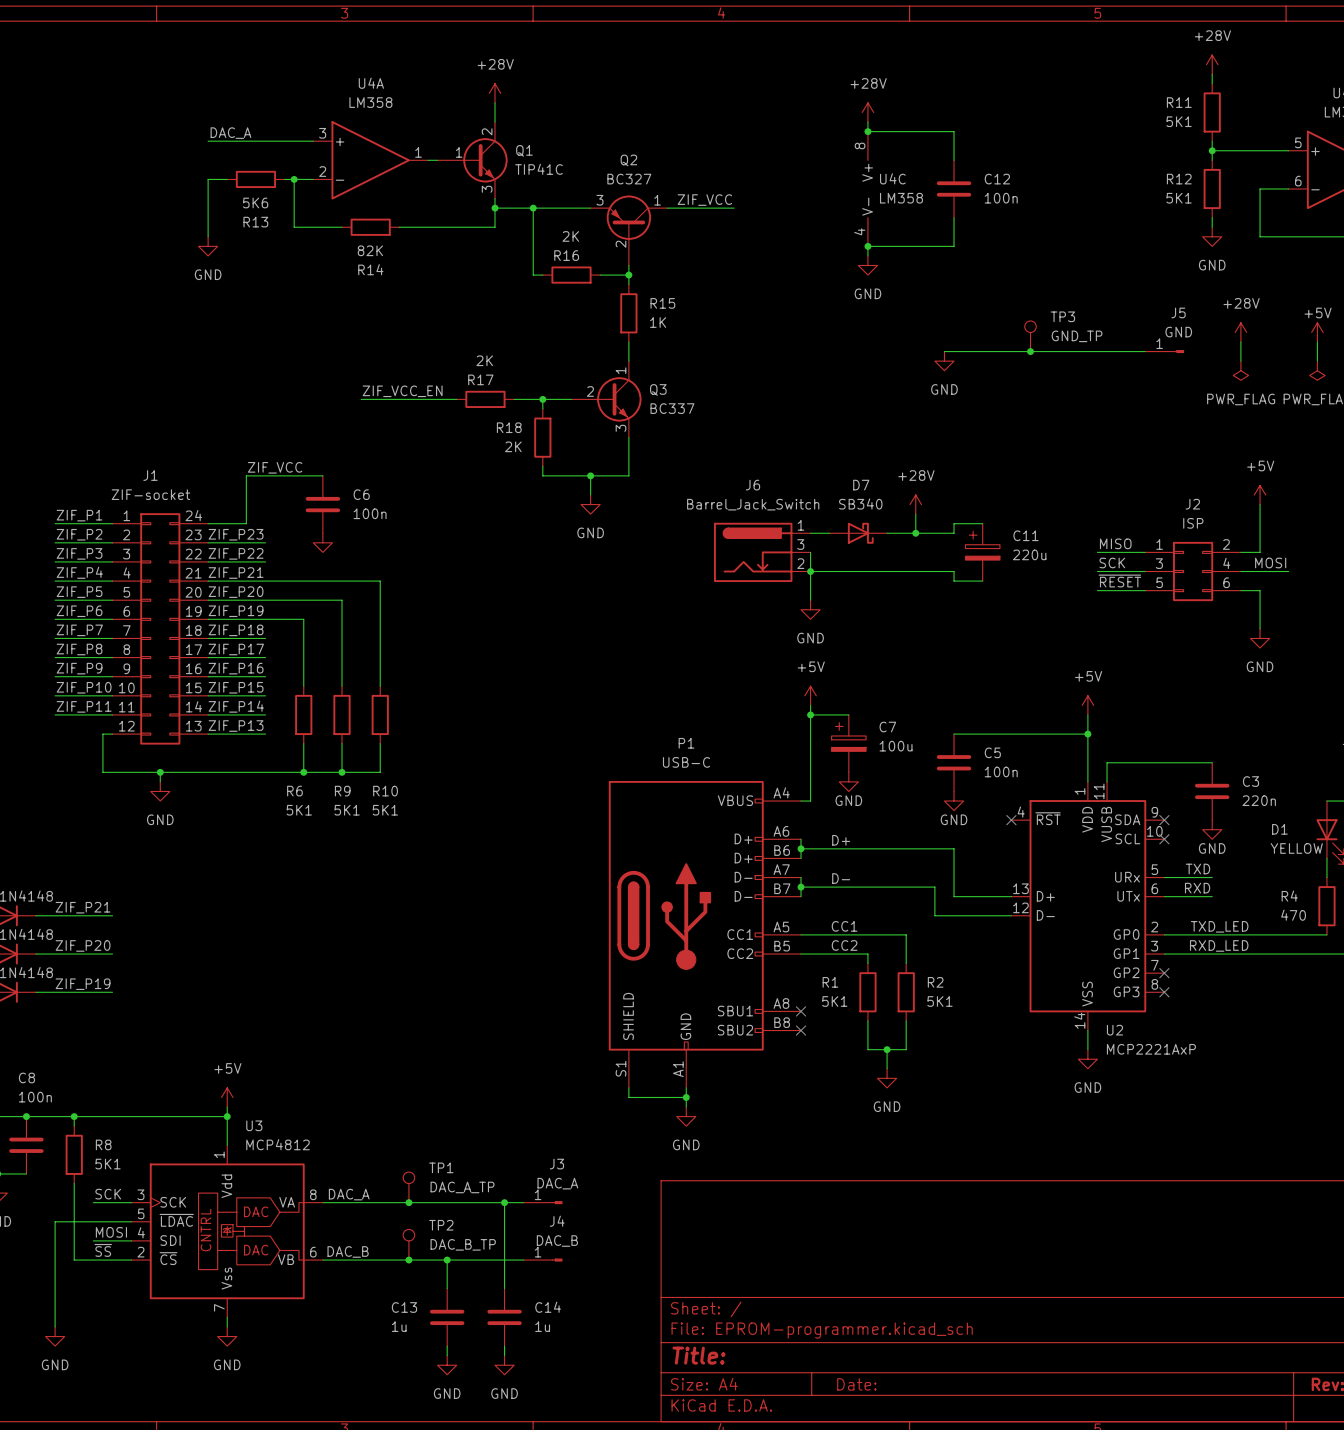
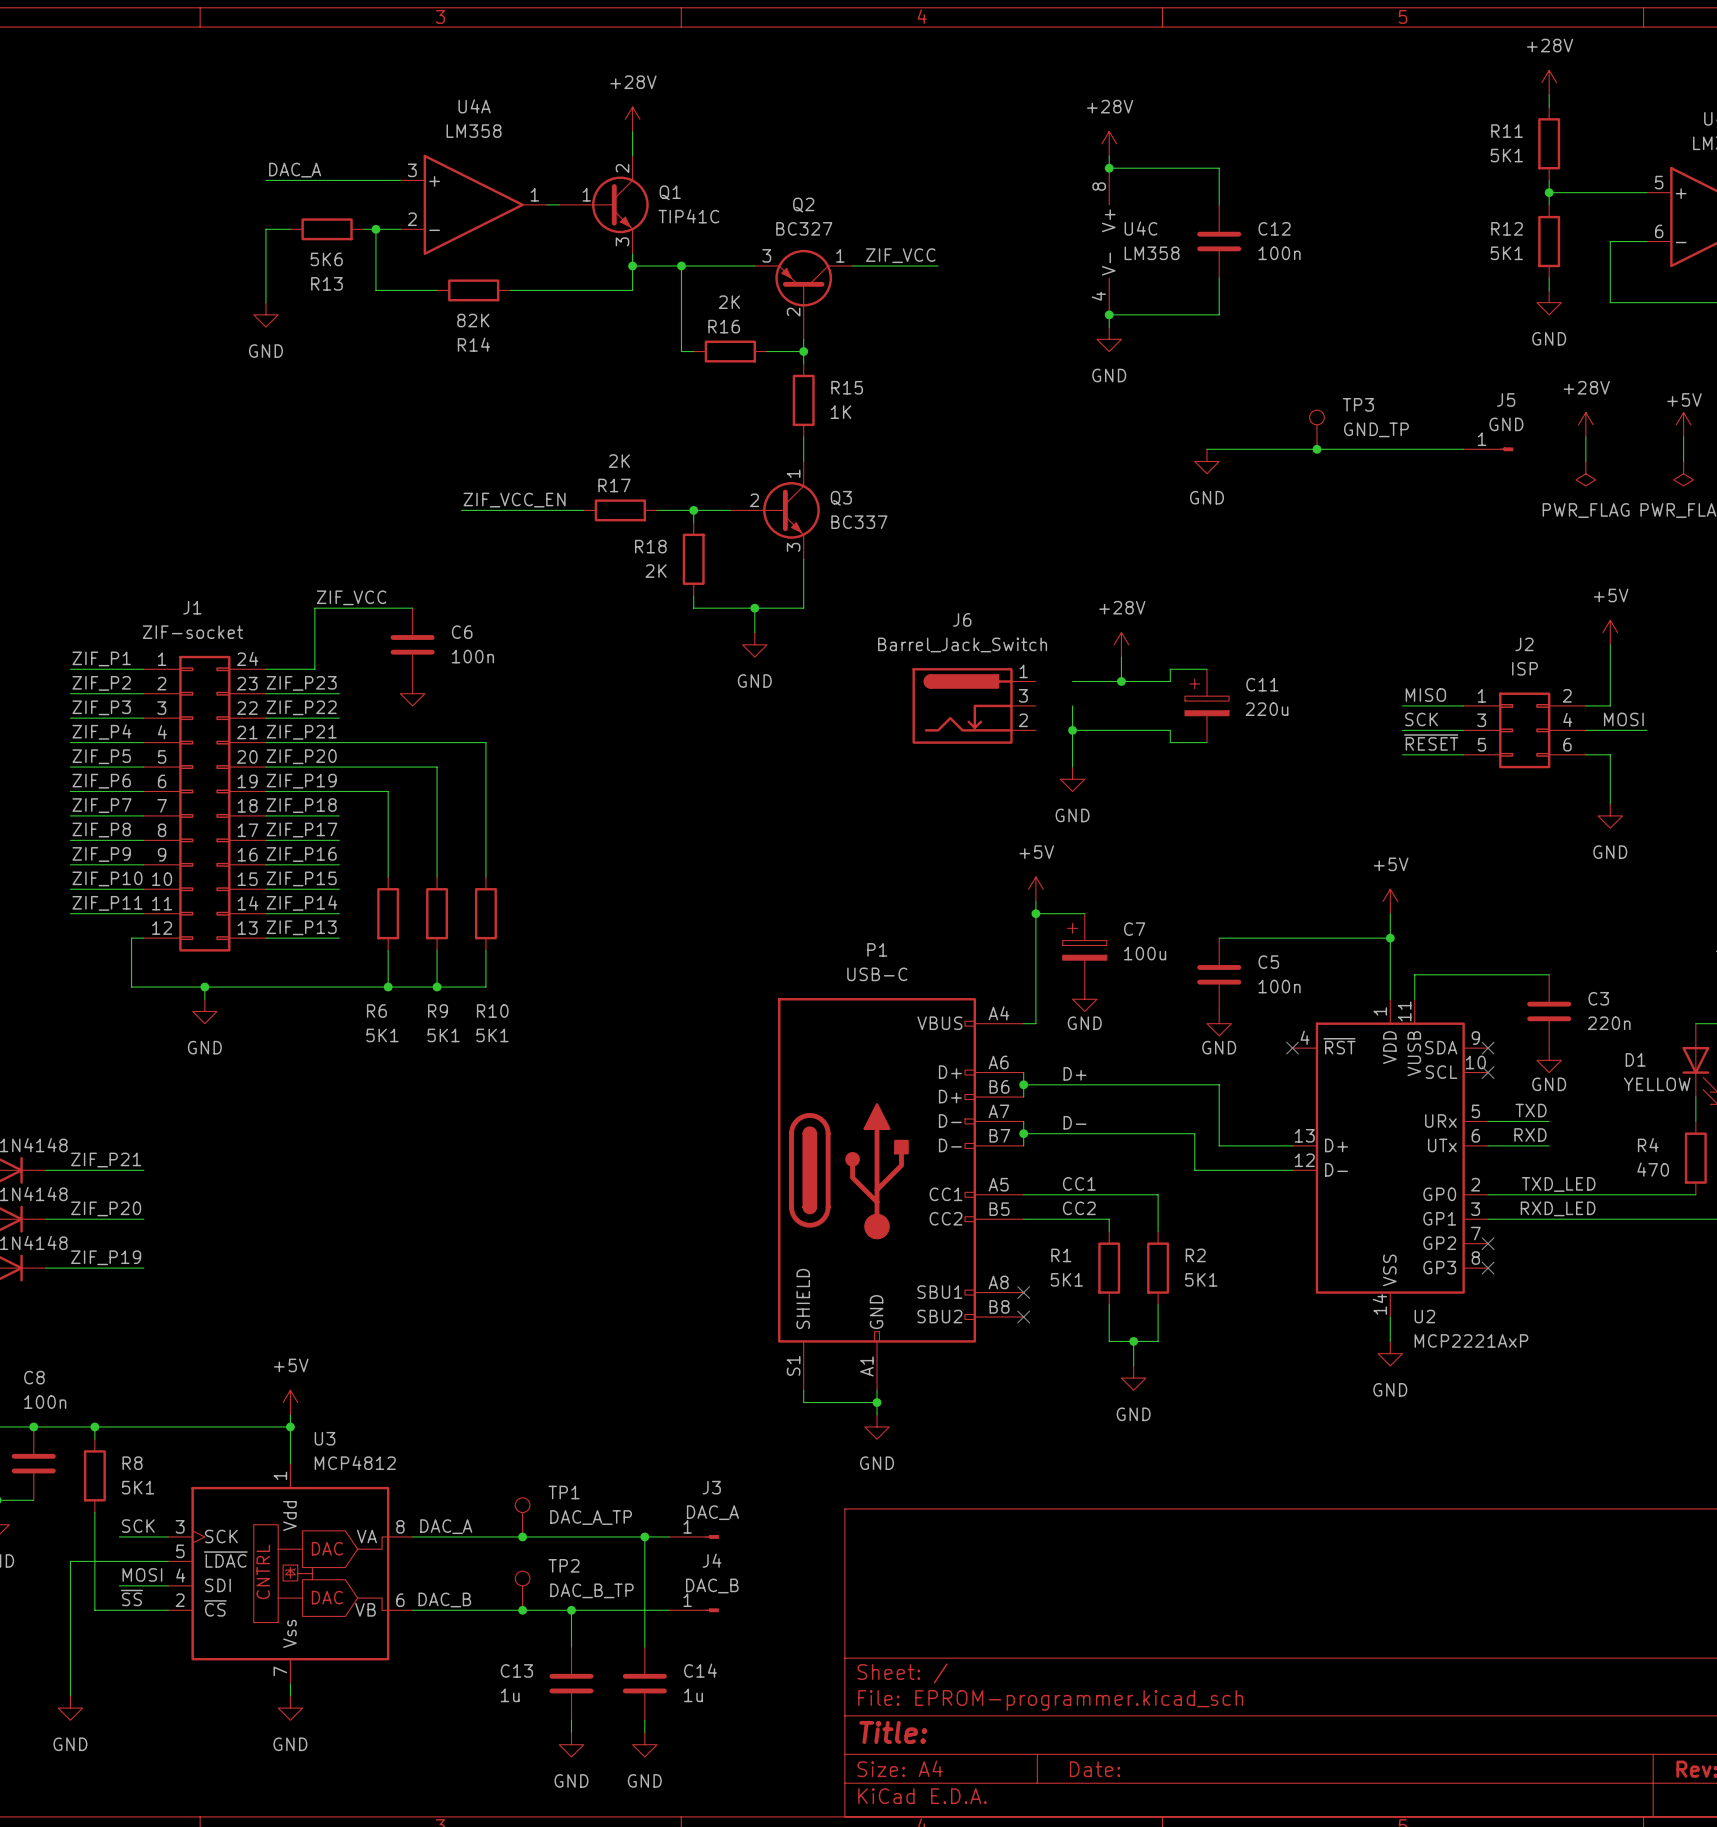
power symbol position: +28V (915, 504) -> +28V (1121, 644)
wire: none -> (1121, 657) (1121, 681)
wire: (915, 514) (915, 523) -> (1206, 669) (1170, 669)
wire: (982, 523) (954, 523) (954, 533) (915, 533) -> none
wire: (810, 533) (829, 533) -> none
D7: SB340 (858, 533) -> none
junction position: (915, 533) -> (1121, 681)
wire: (810, 552) (810, 600) -> (1072, 705) (1072, 767)
C11 position: (982, 552) -> (1206, 705)
wire: (810, 571) (839, 571) -> none
junction position: (810, 571) -> (1072, 730)
wire: (915, 571) (954, 571) (954, 581) (982, 581) -> (1170, 730) (1170, 742) (1206, 742)
power symbol position: GND (810, 609) -> GND (1072, 779)

